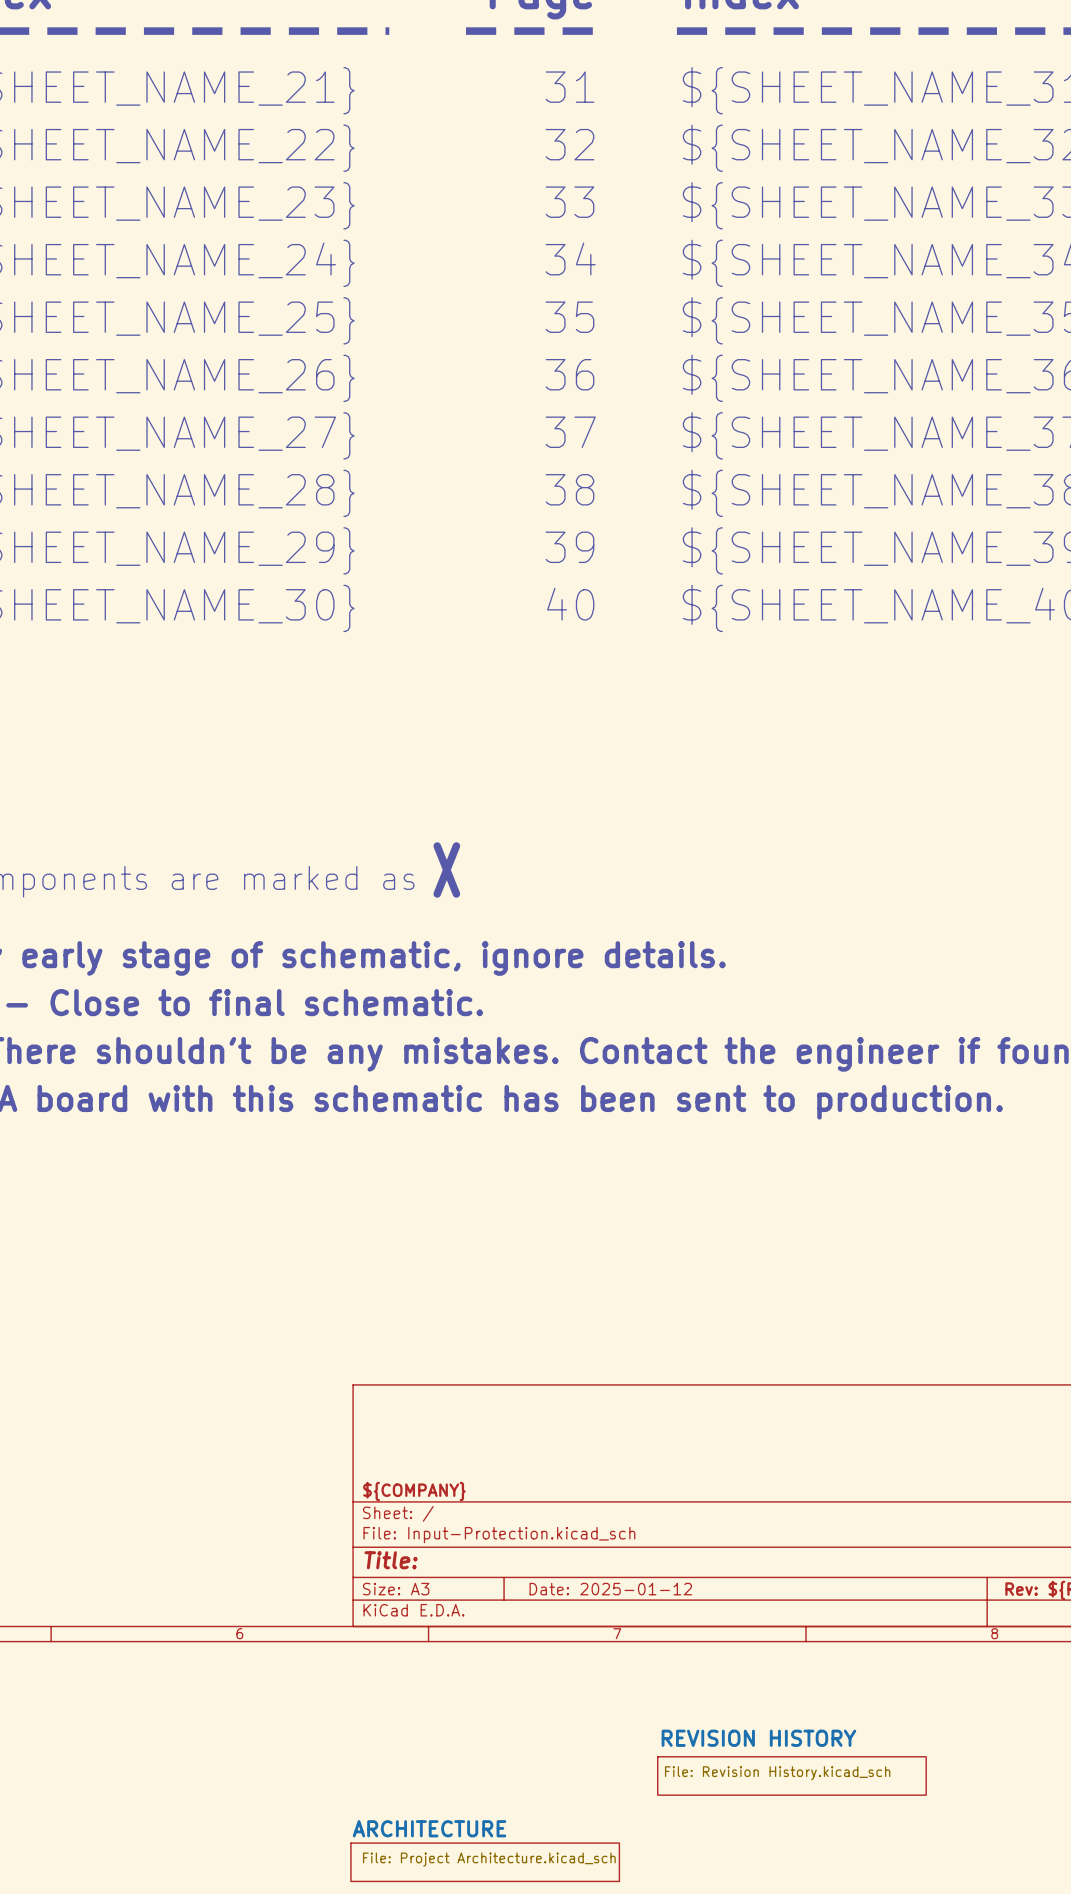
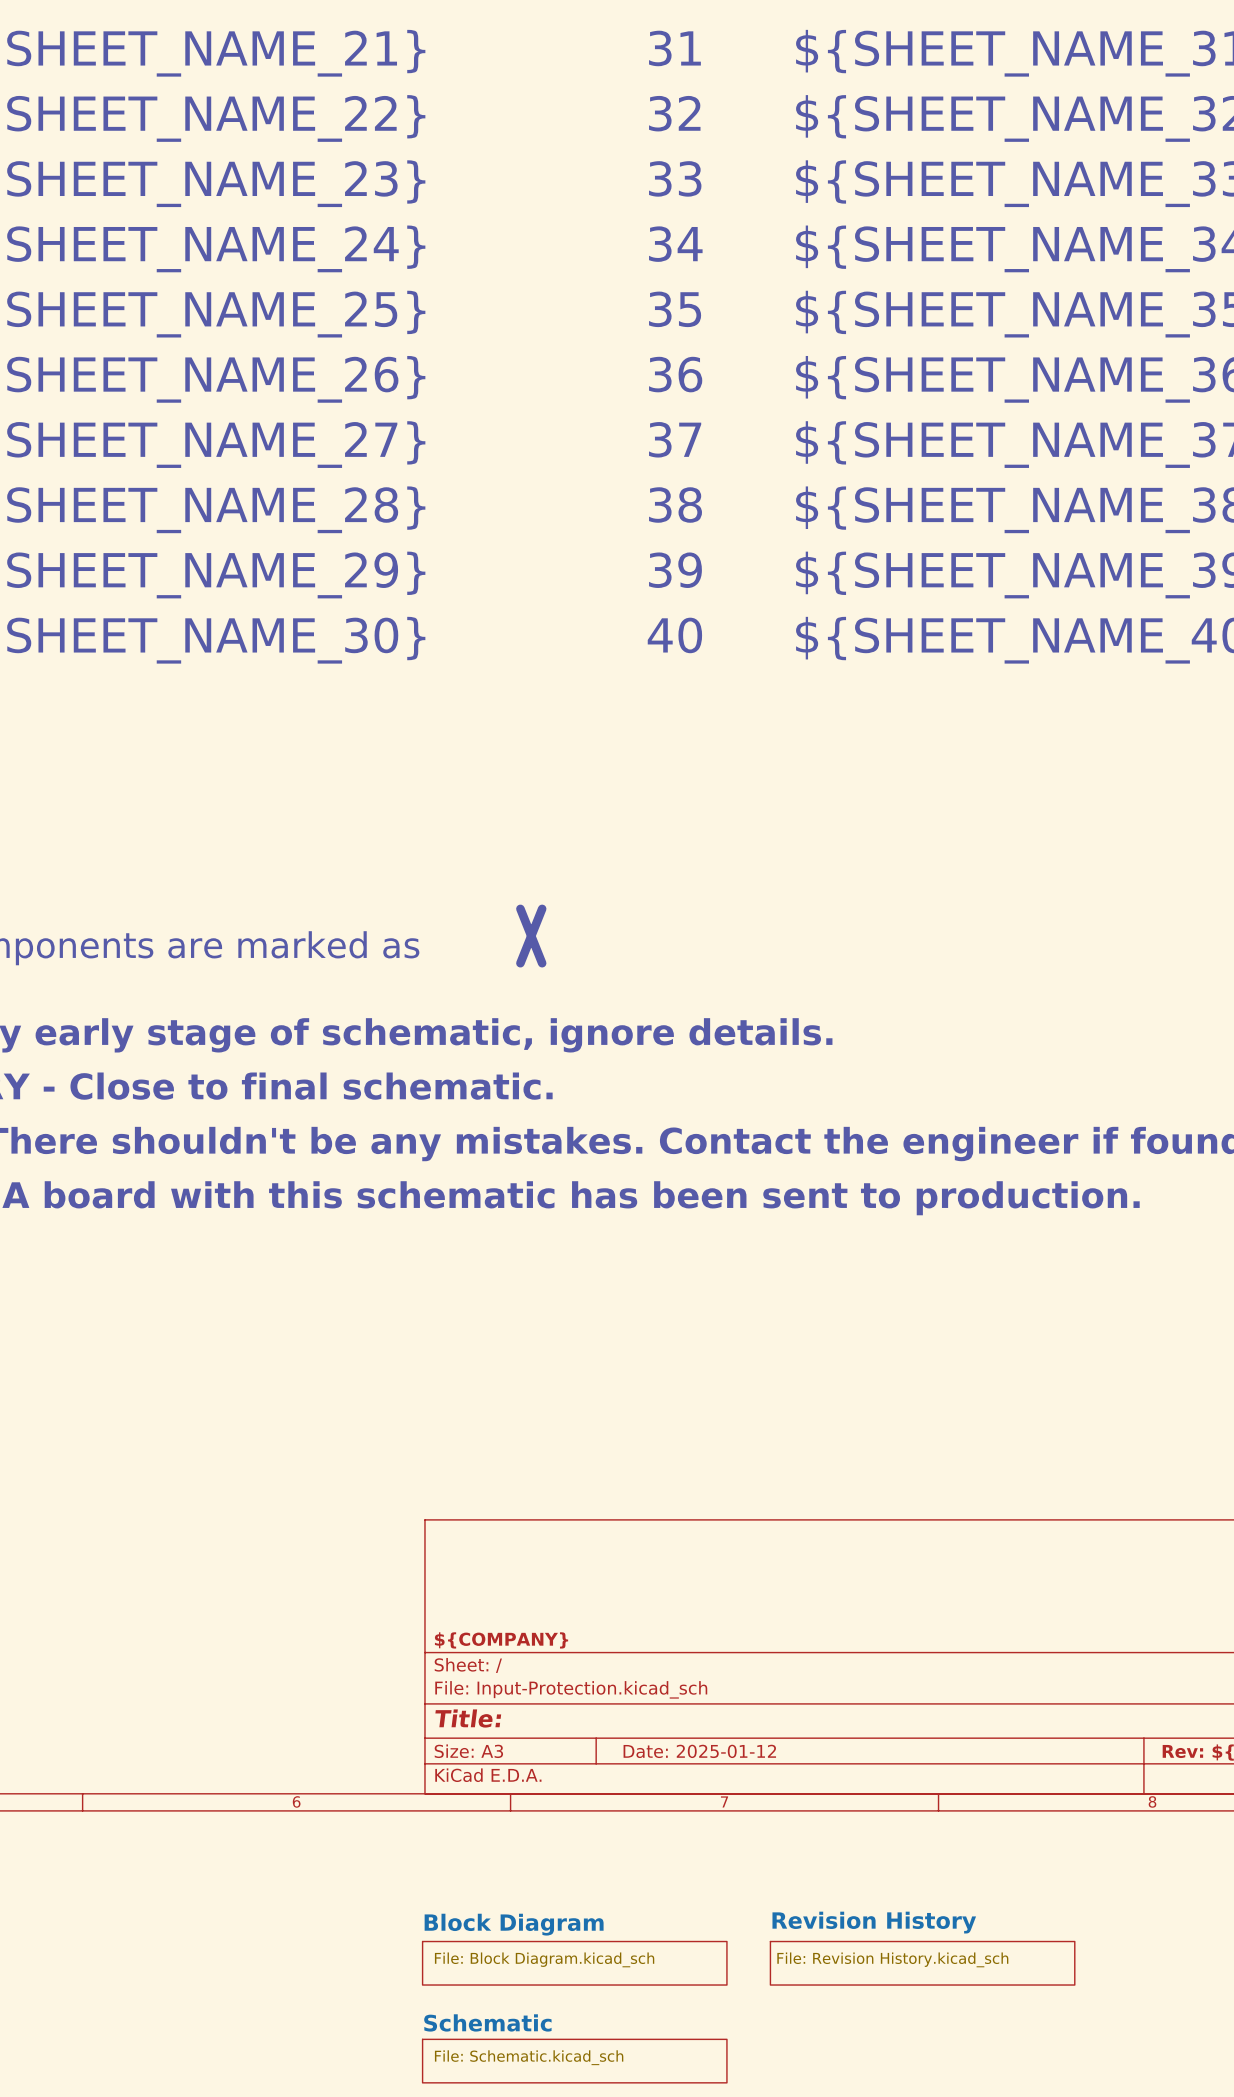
sheet REVISION HISTORY name: REVISION HISTORY (758, 1738) -> Revision History (874, 1922)
sheet Block Diagram: none -> File: Block Diagram.kicad_sch (574, 1963)
sheet ARCHITECTURE name: ARCHITECTURE (429, 1828) -> Schematic (487, 2022)
sheet ARCHITECTURE value: File: Project Architecture.kicad_sch (489, 1859) -> File: Schematic.kicad_sch (529, 2057)

